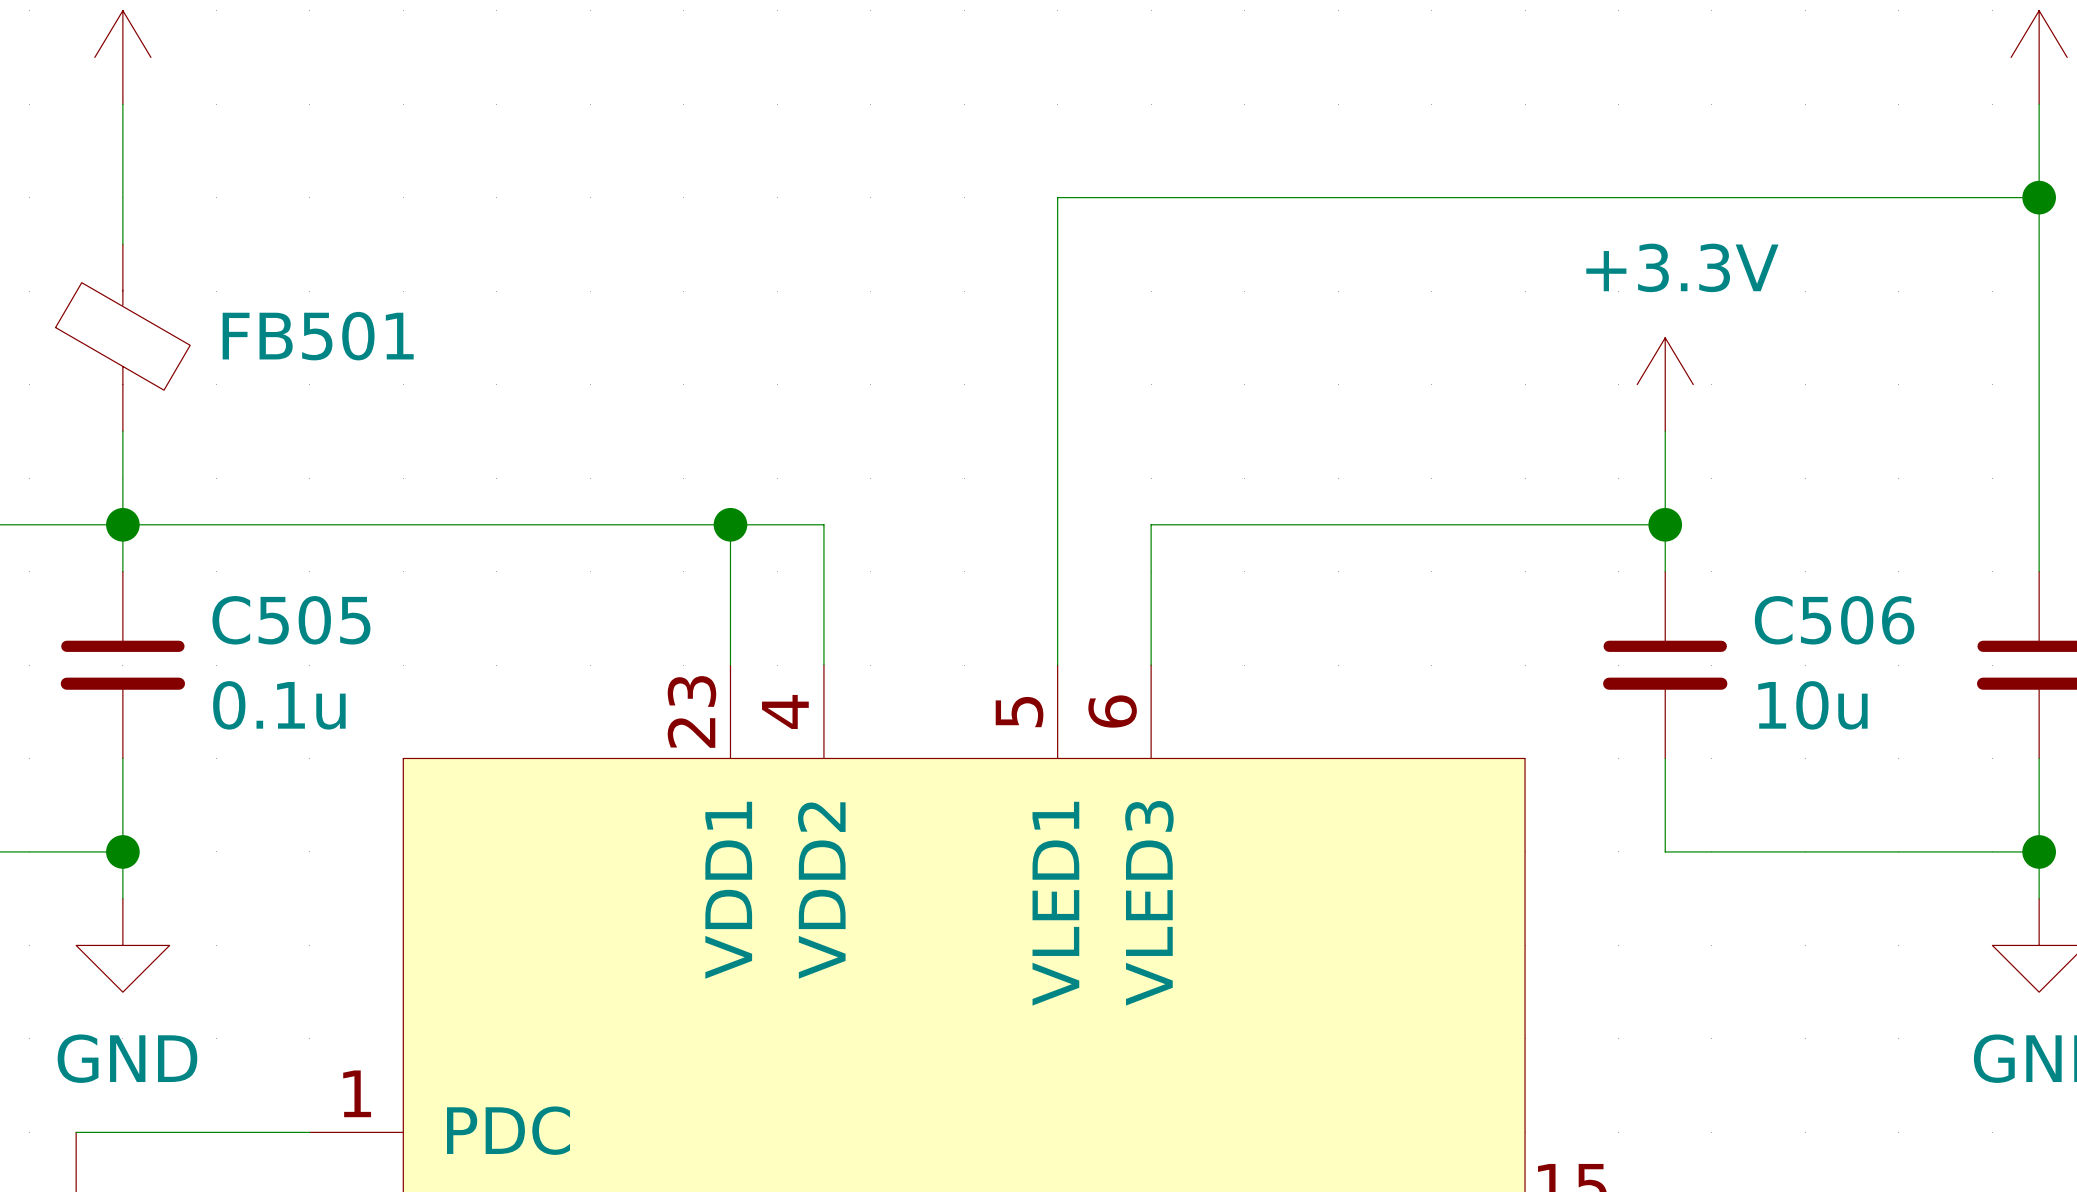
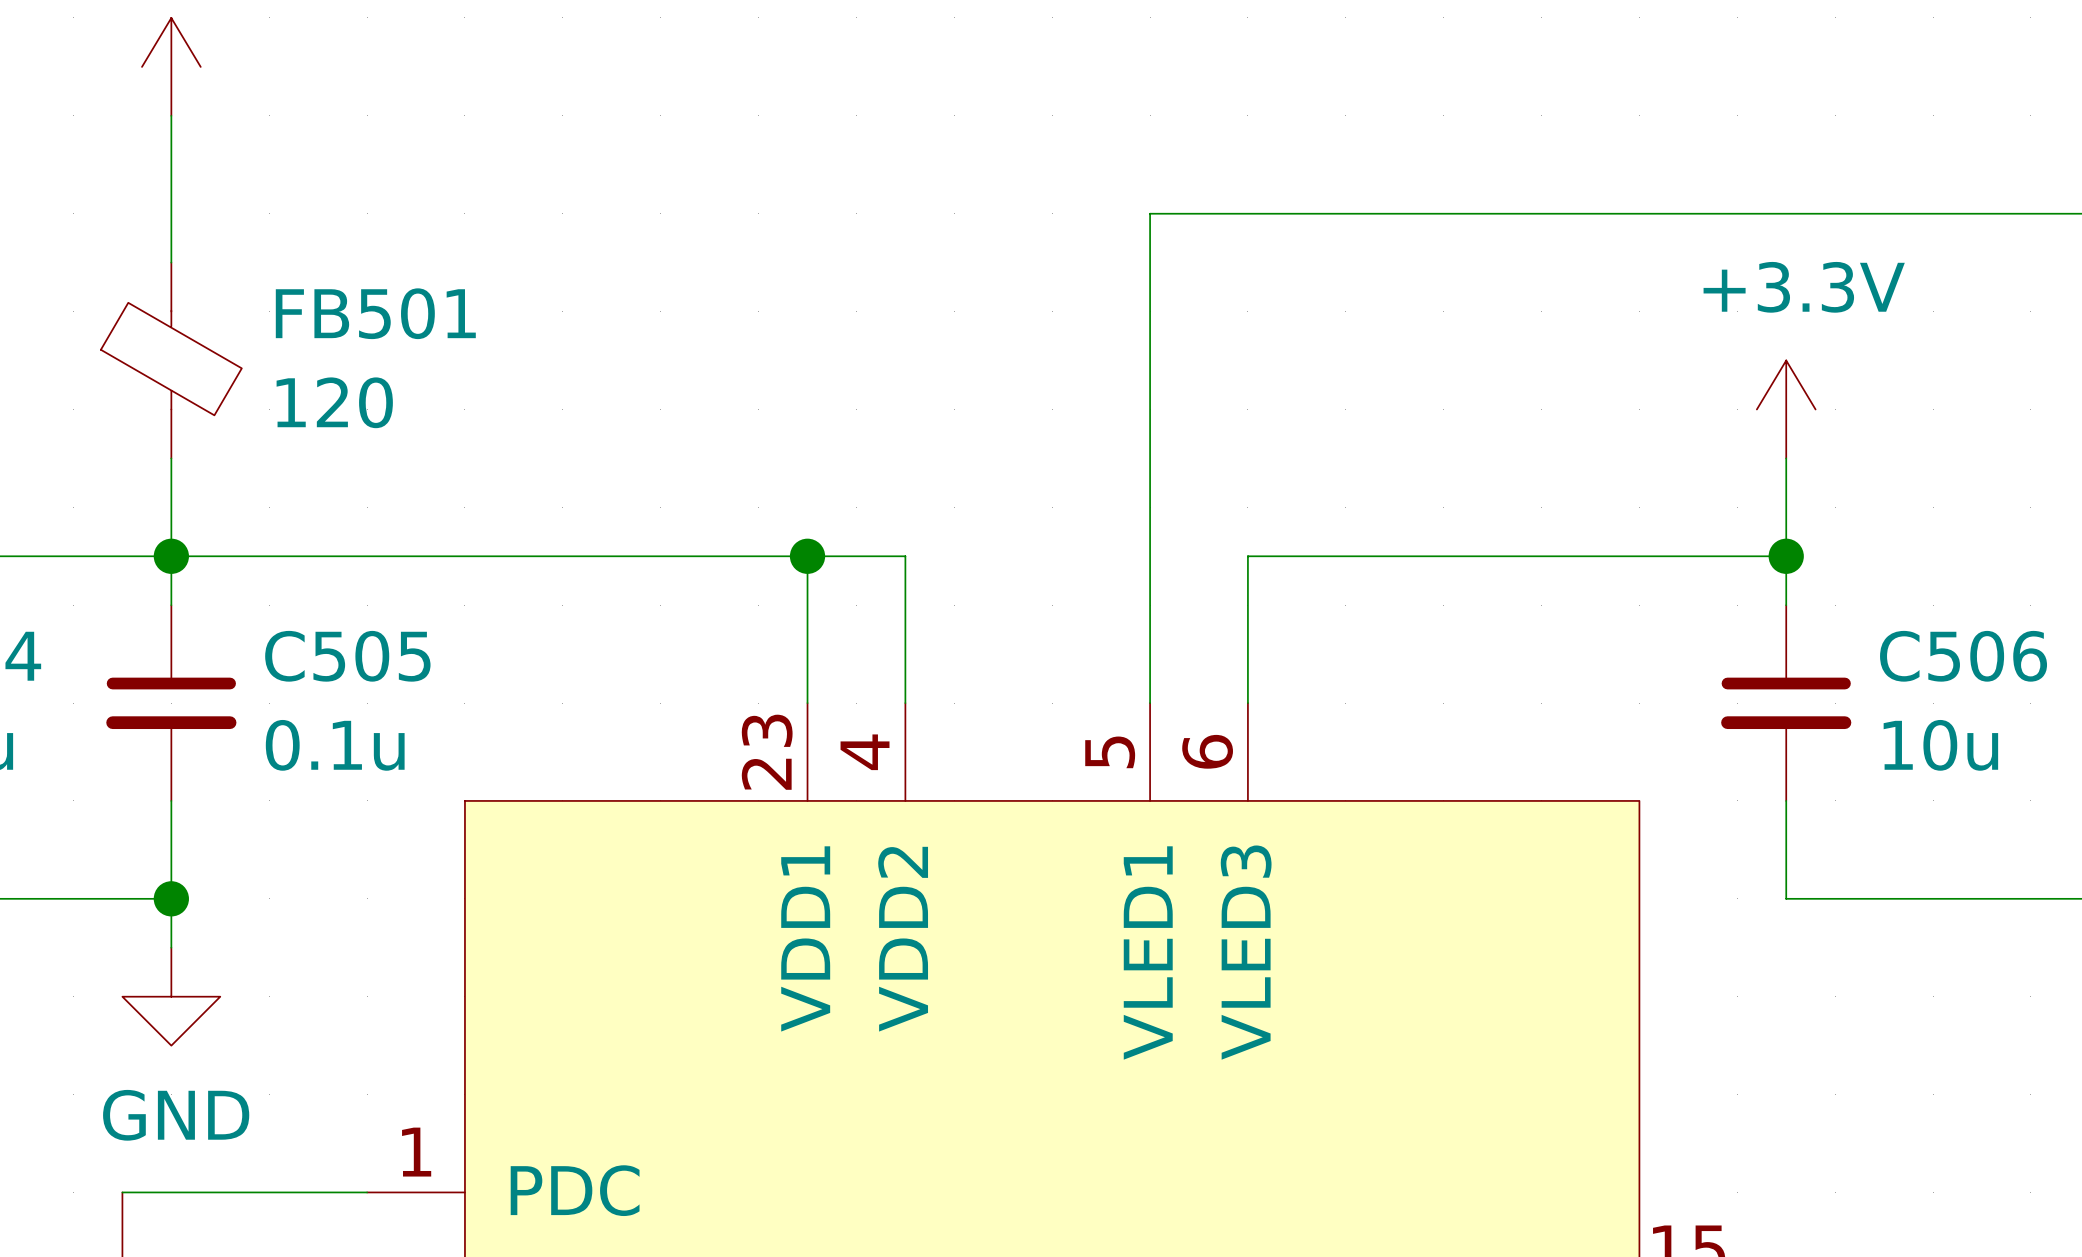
FB501 name position: FB501 (318, 336) -> FB501 (375, 313)
FB501 value: none -> 120 (334, 402)

